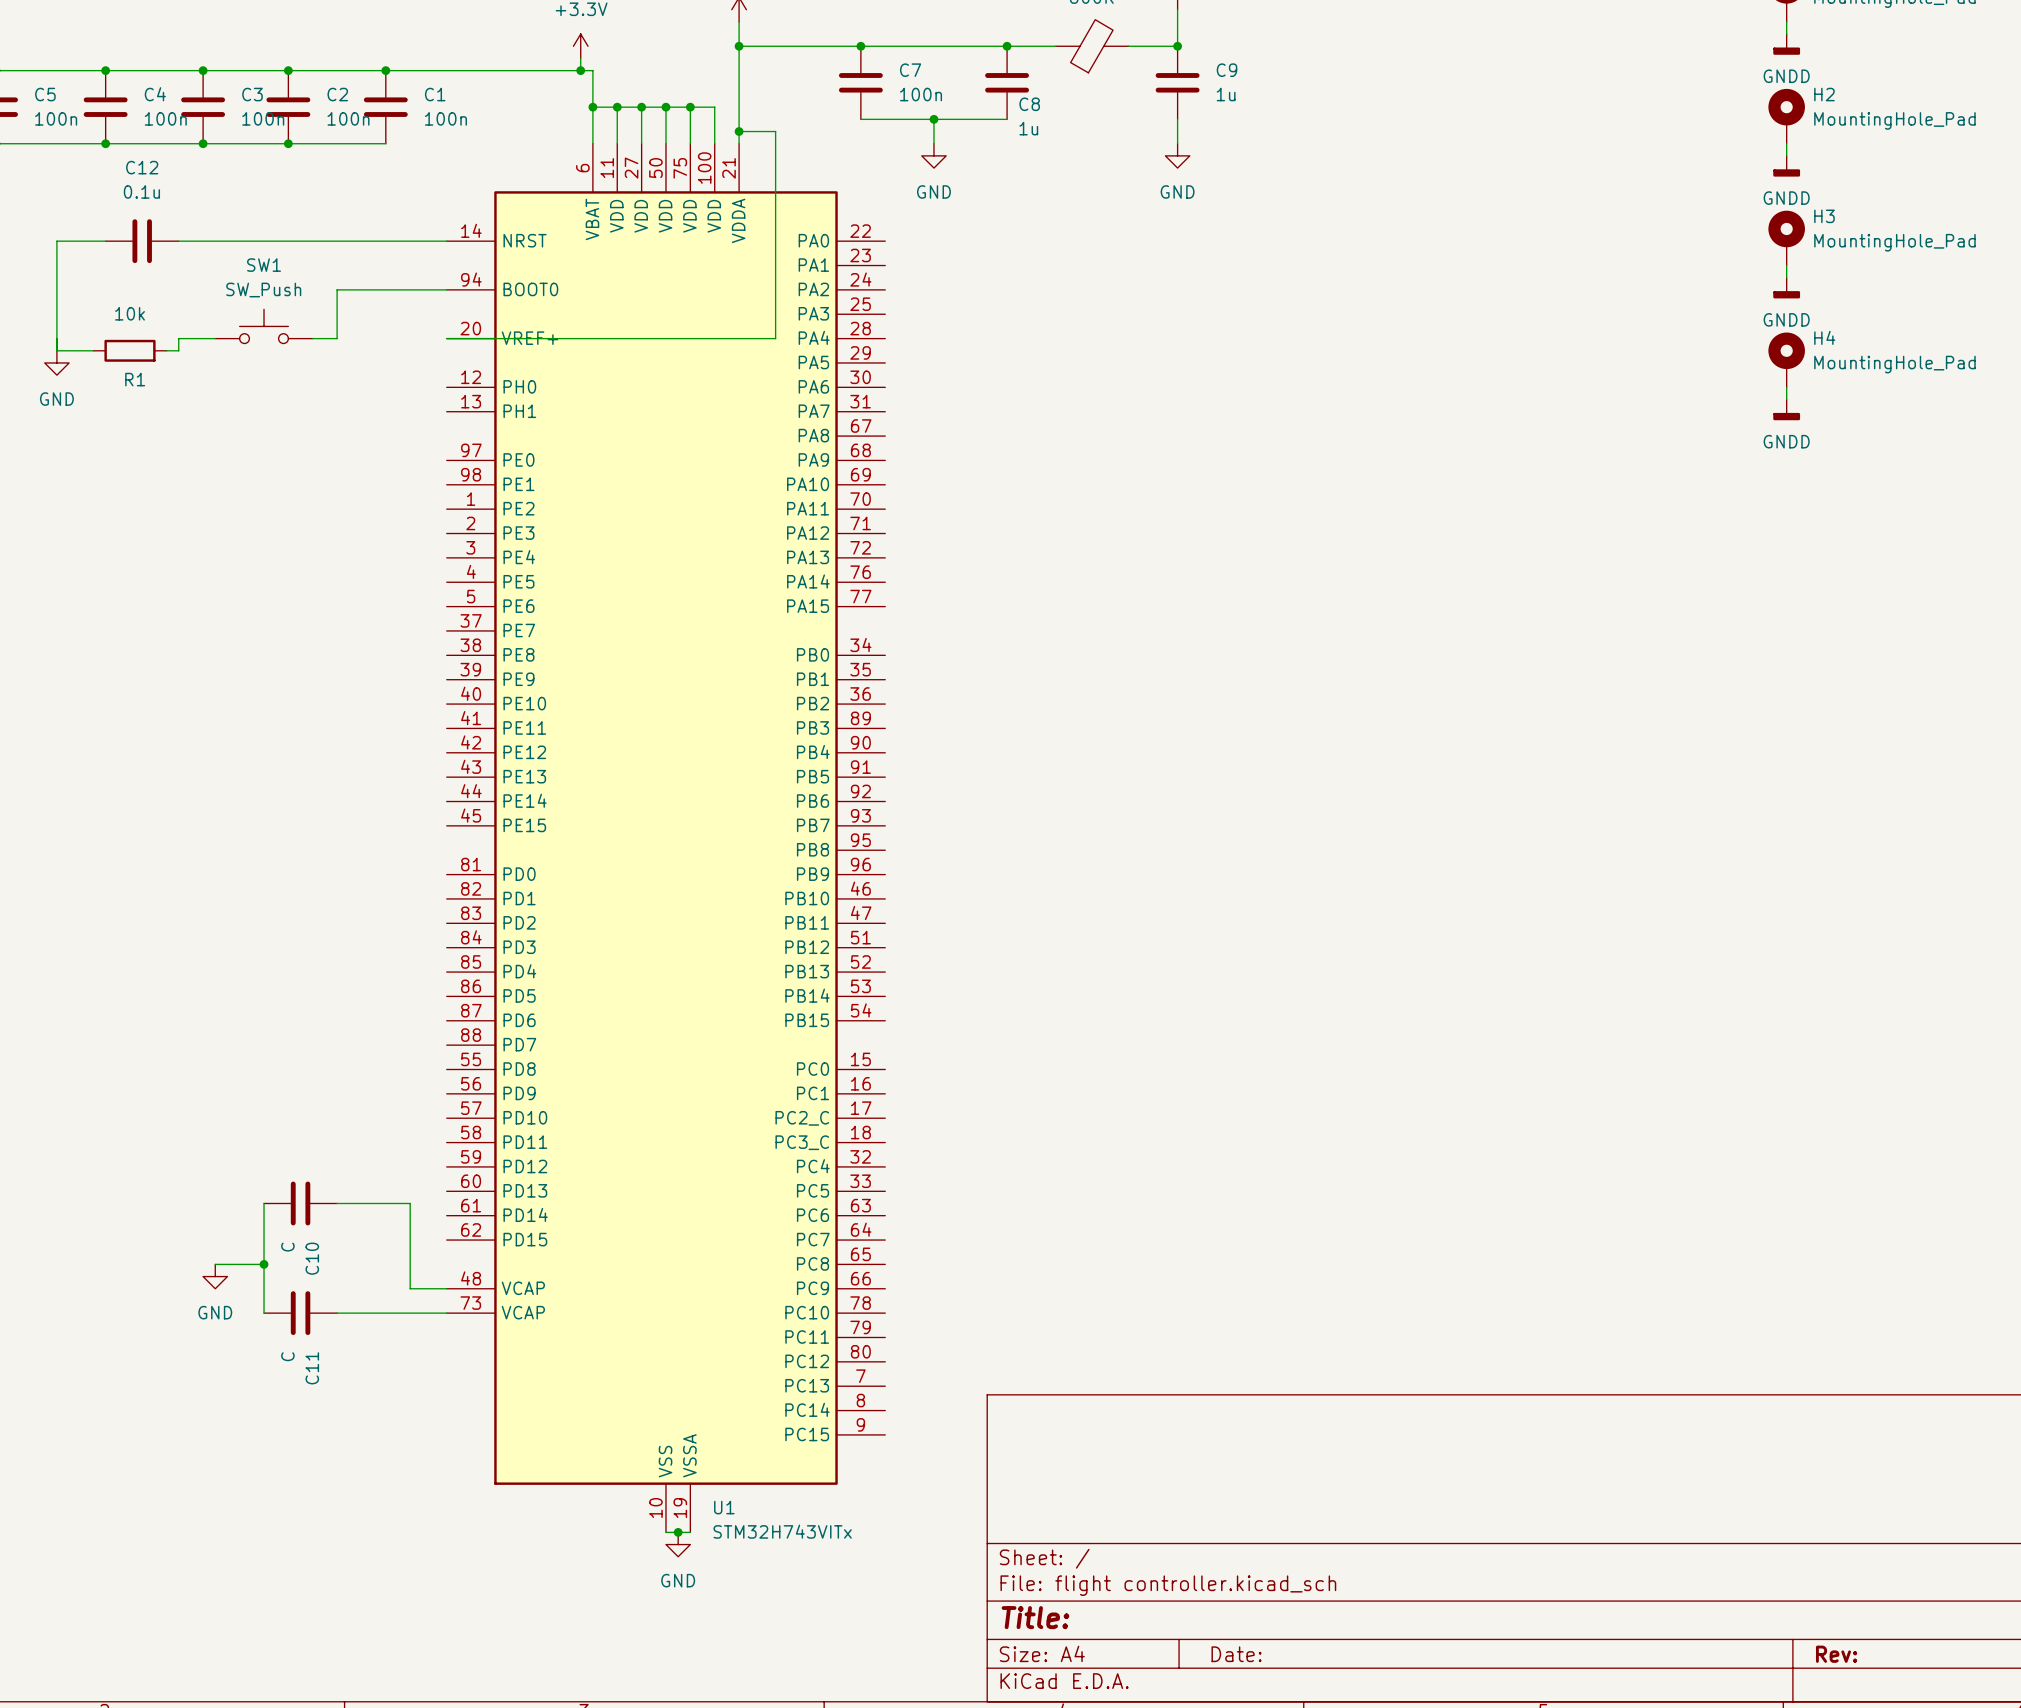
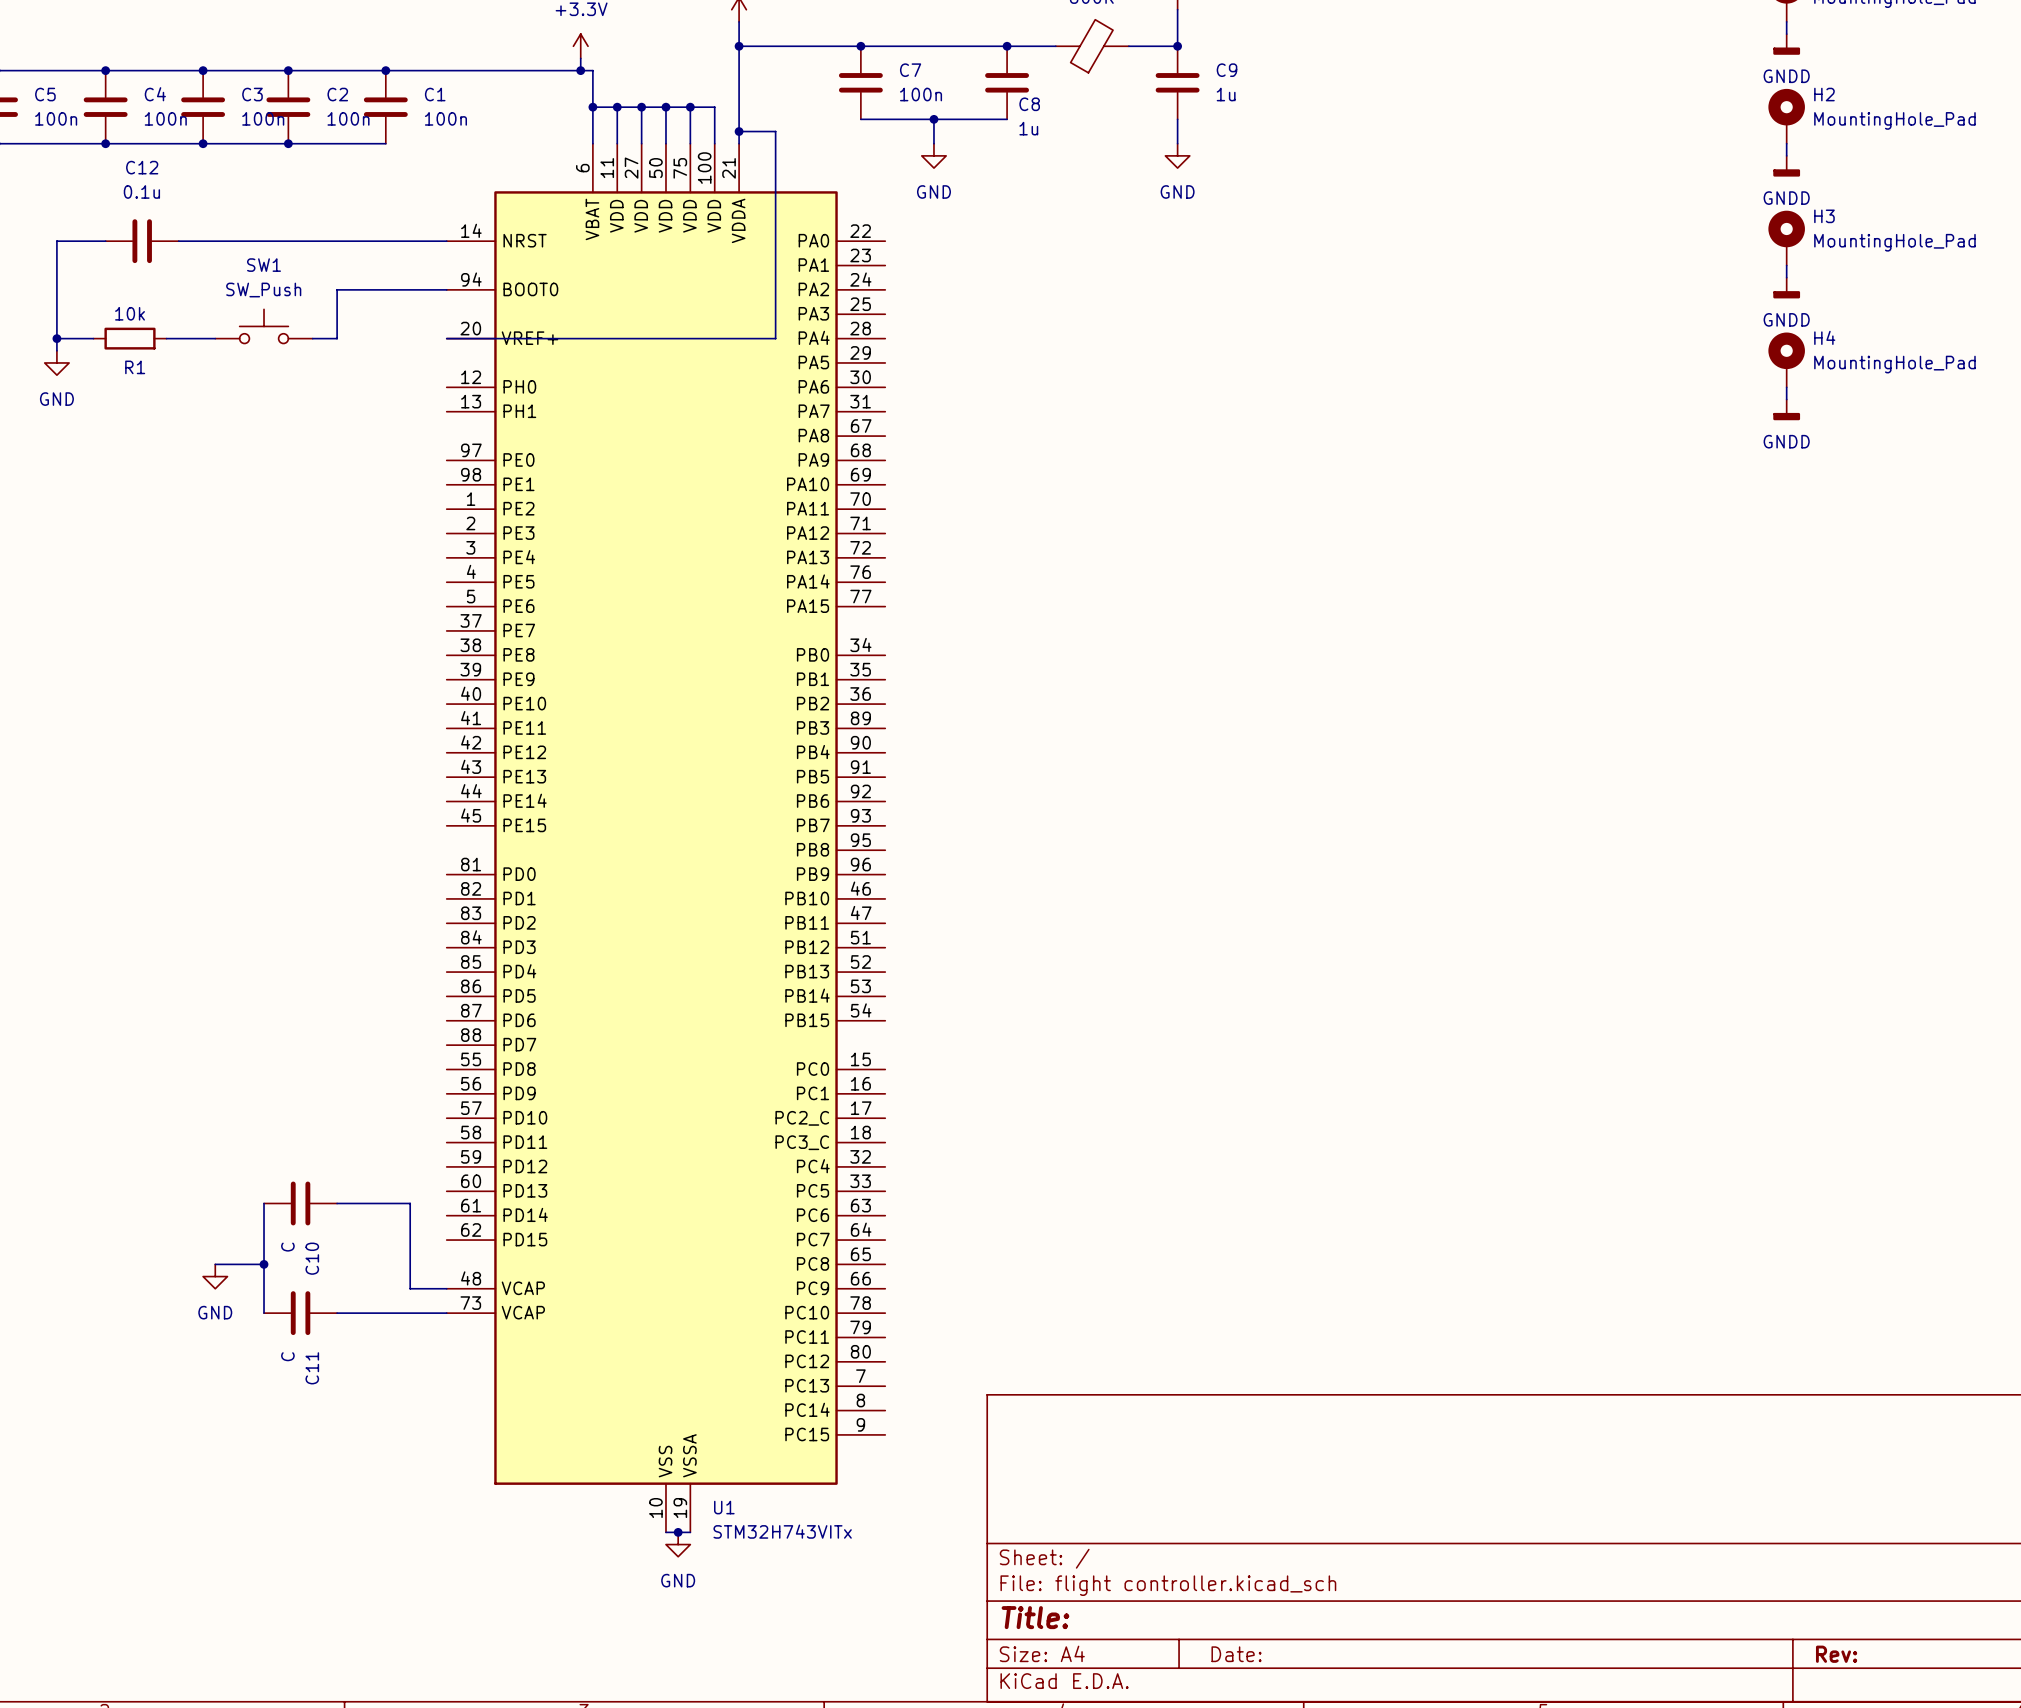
junction: none -> (56, 338)
wire: (178, 338) (178, 350) (166, 350) -> (178, 338) (166, 338)
wire: (56, 350) (93, 350) -> (56, 338) (93, 338)
R1 position: (130, 350) -> (130, 338)

